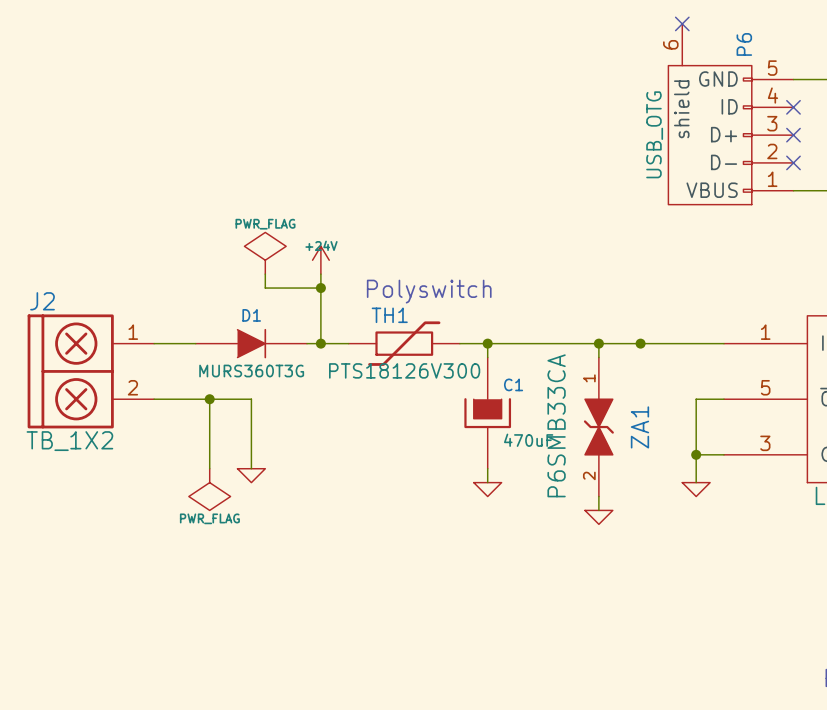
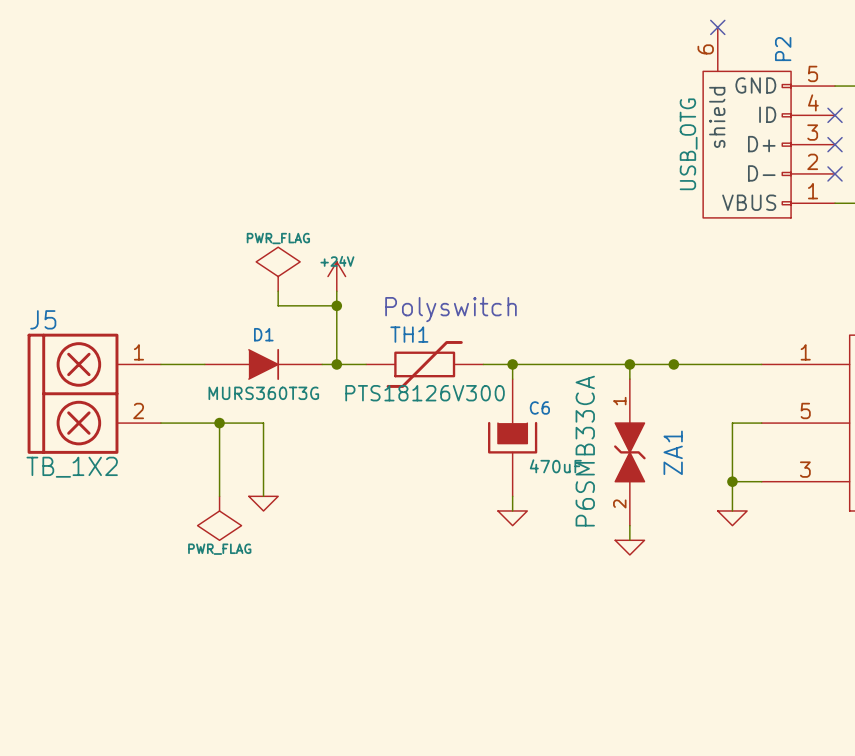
P6 name: P6 (744, 44) -> P2 (783, 49)
J2 name: J2 (42, 301) -> J5 (43, 319)
C1 name: C1 (513, 384) -> C6 (539, 407)

